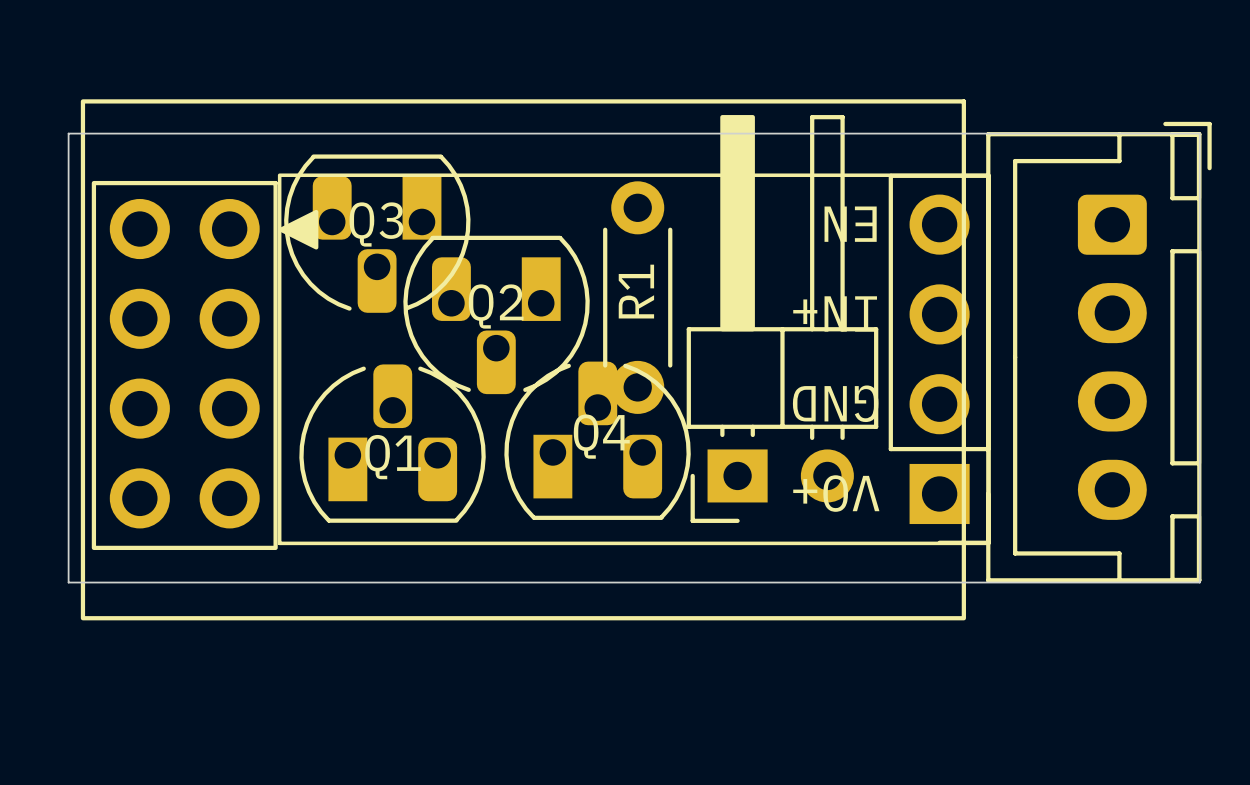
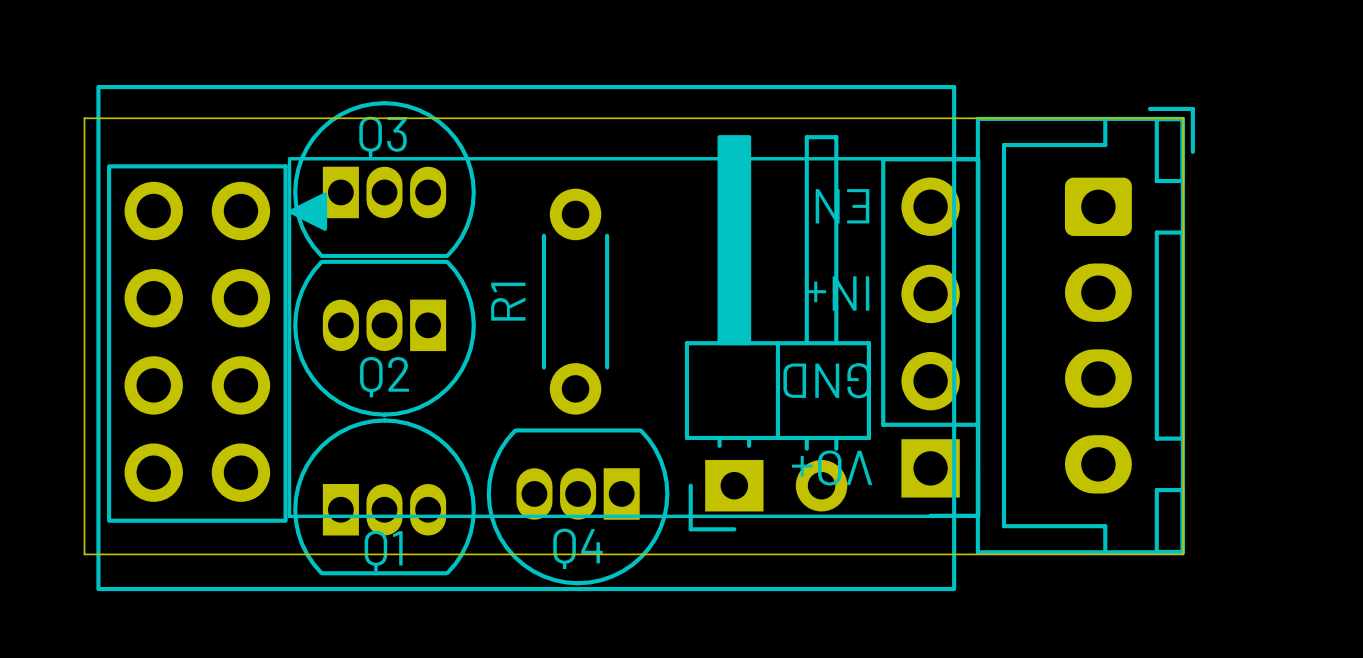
Q3 footprint: [284, 154, 471, 313] -> [293, 101, 476, 259]
Q2 footprint: [403, 235, 590, 395] -> [293, 259, 476, 417]
R1 name position: R1 (636, 291) -> R1 (508, 301)
R1 position: (637, 297) -> (575, 301)
part position: (782, 319) -> (777, 333)
Q4 footprint: [504, 361, 691, 520] -> [486, 428, 670, 586]
Q1 footprint: [299, 364, 486, 523] -> [293, 418, 476, 576]

